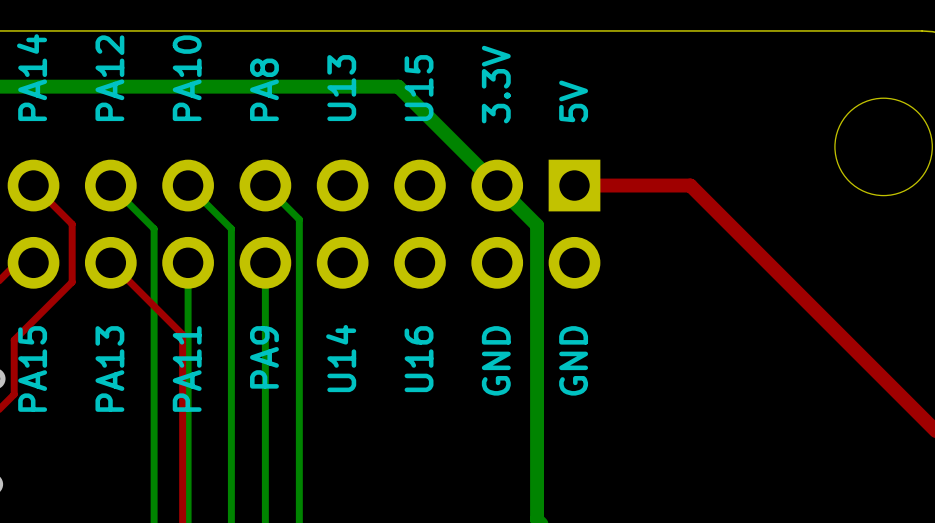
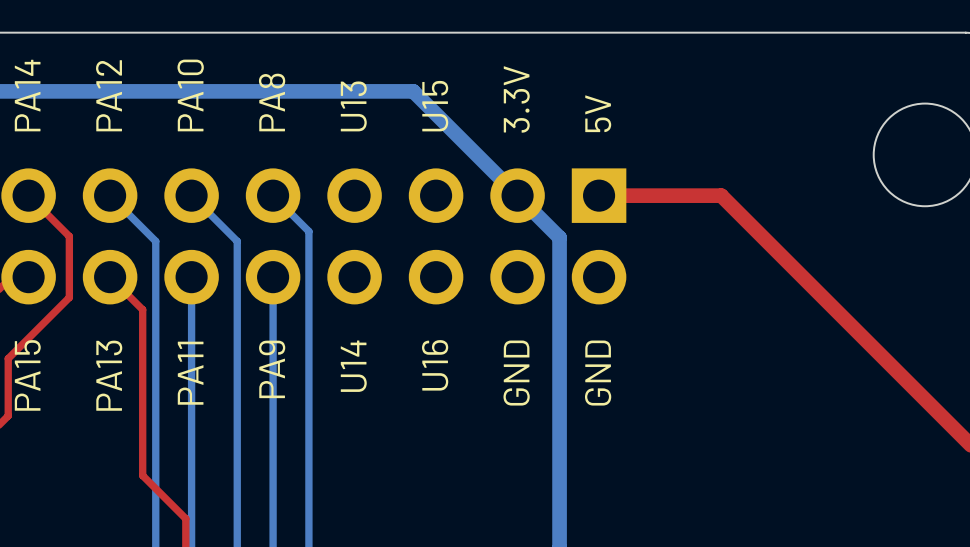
top track: (141, 293) (182, 334) (182, 491) -> (142, 309) (142, 475) (185, 518)

